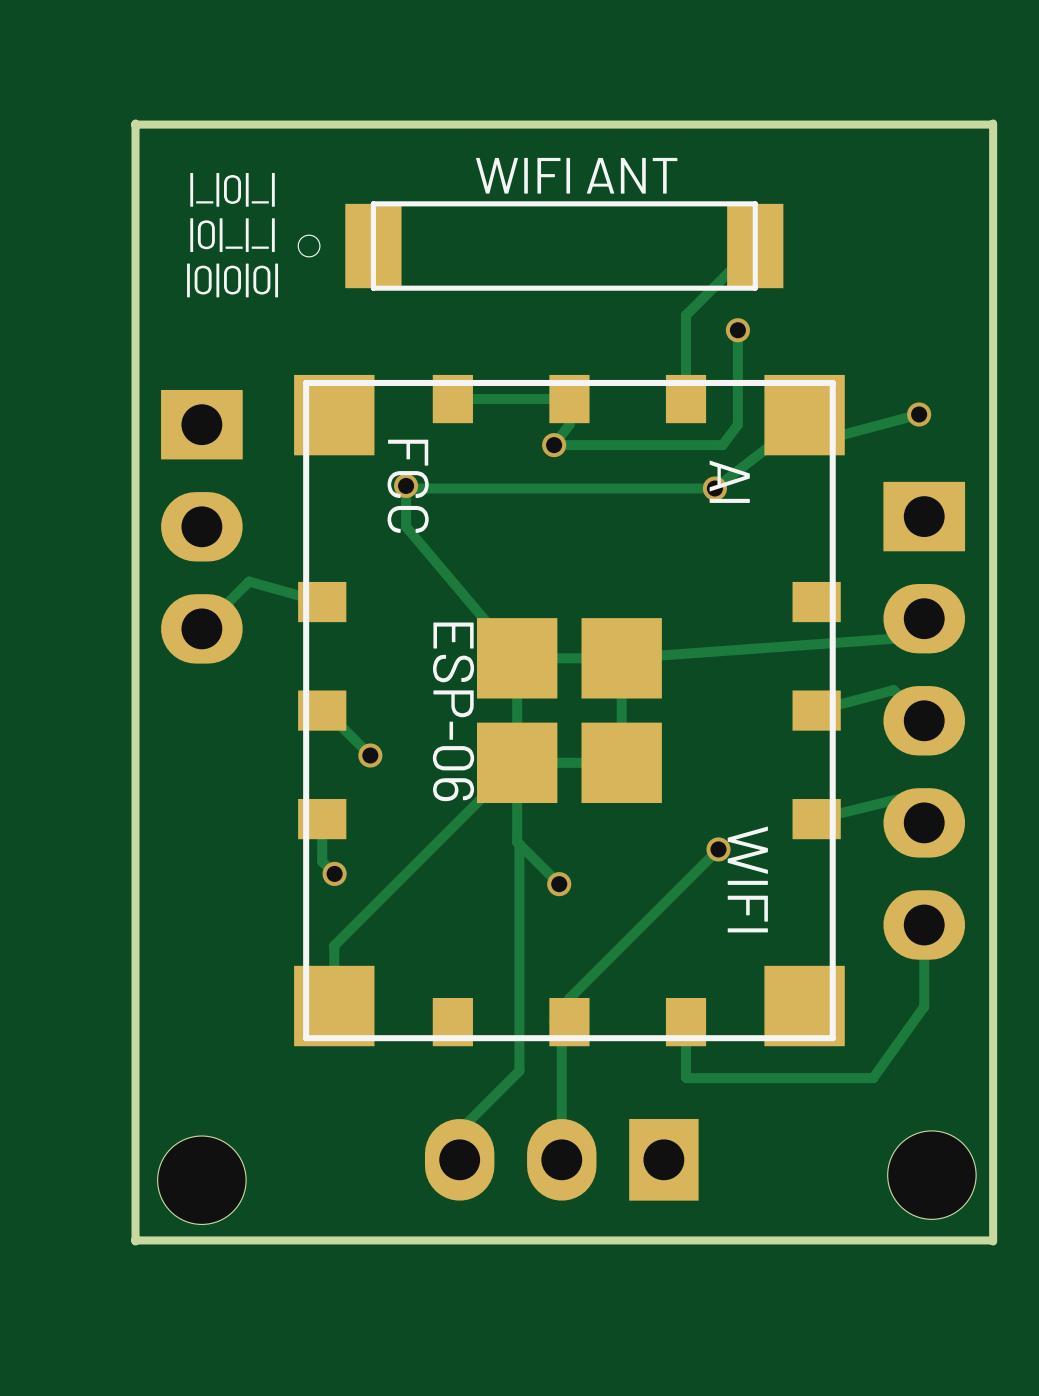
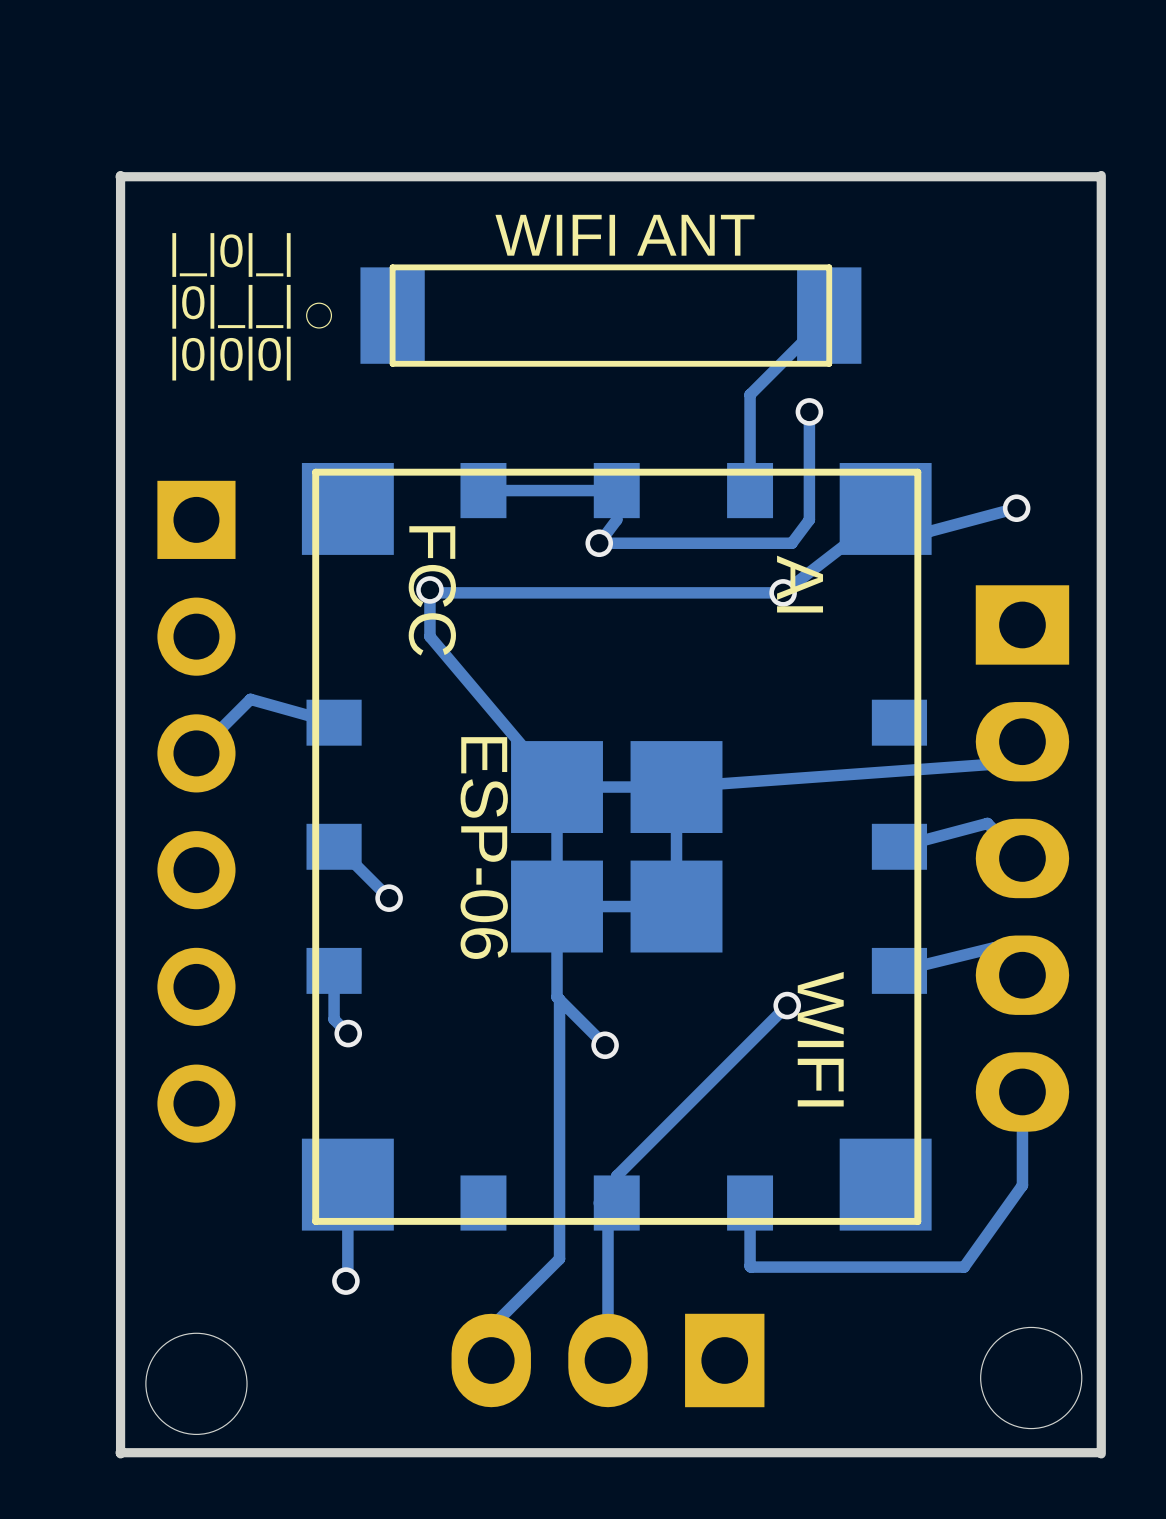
part: (201, 526) -> none
part: none -> (196, 811)
track: (517, 762) (334, 945) (334, 1006) (299, 1006) -> none
track: none -> (347, 1217) (347, 1279) (345, 1281)
via: none -> (345, 1281)

